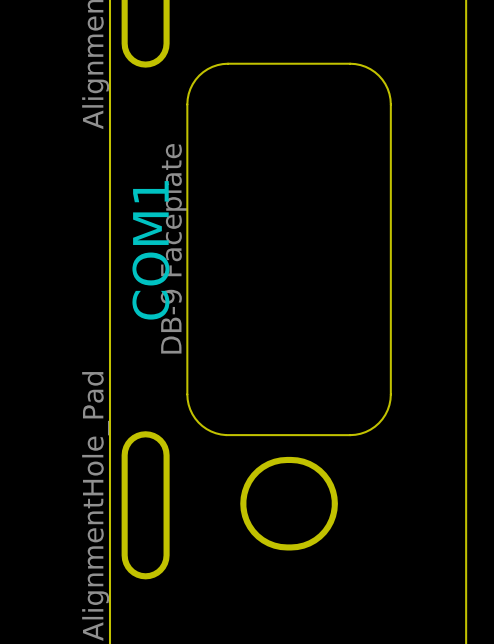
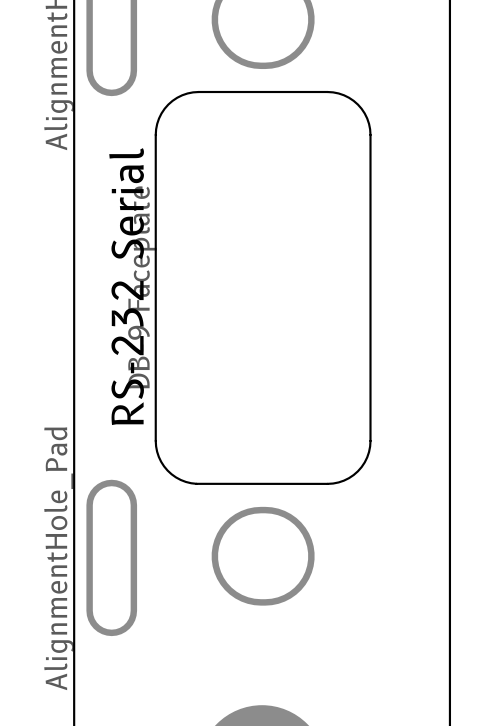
text: COM1 (150, 250) -> RS-232 Serial (126, 286)

